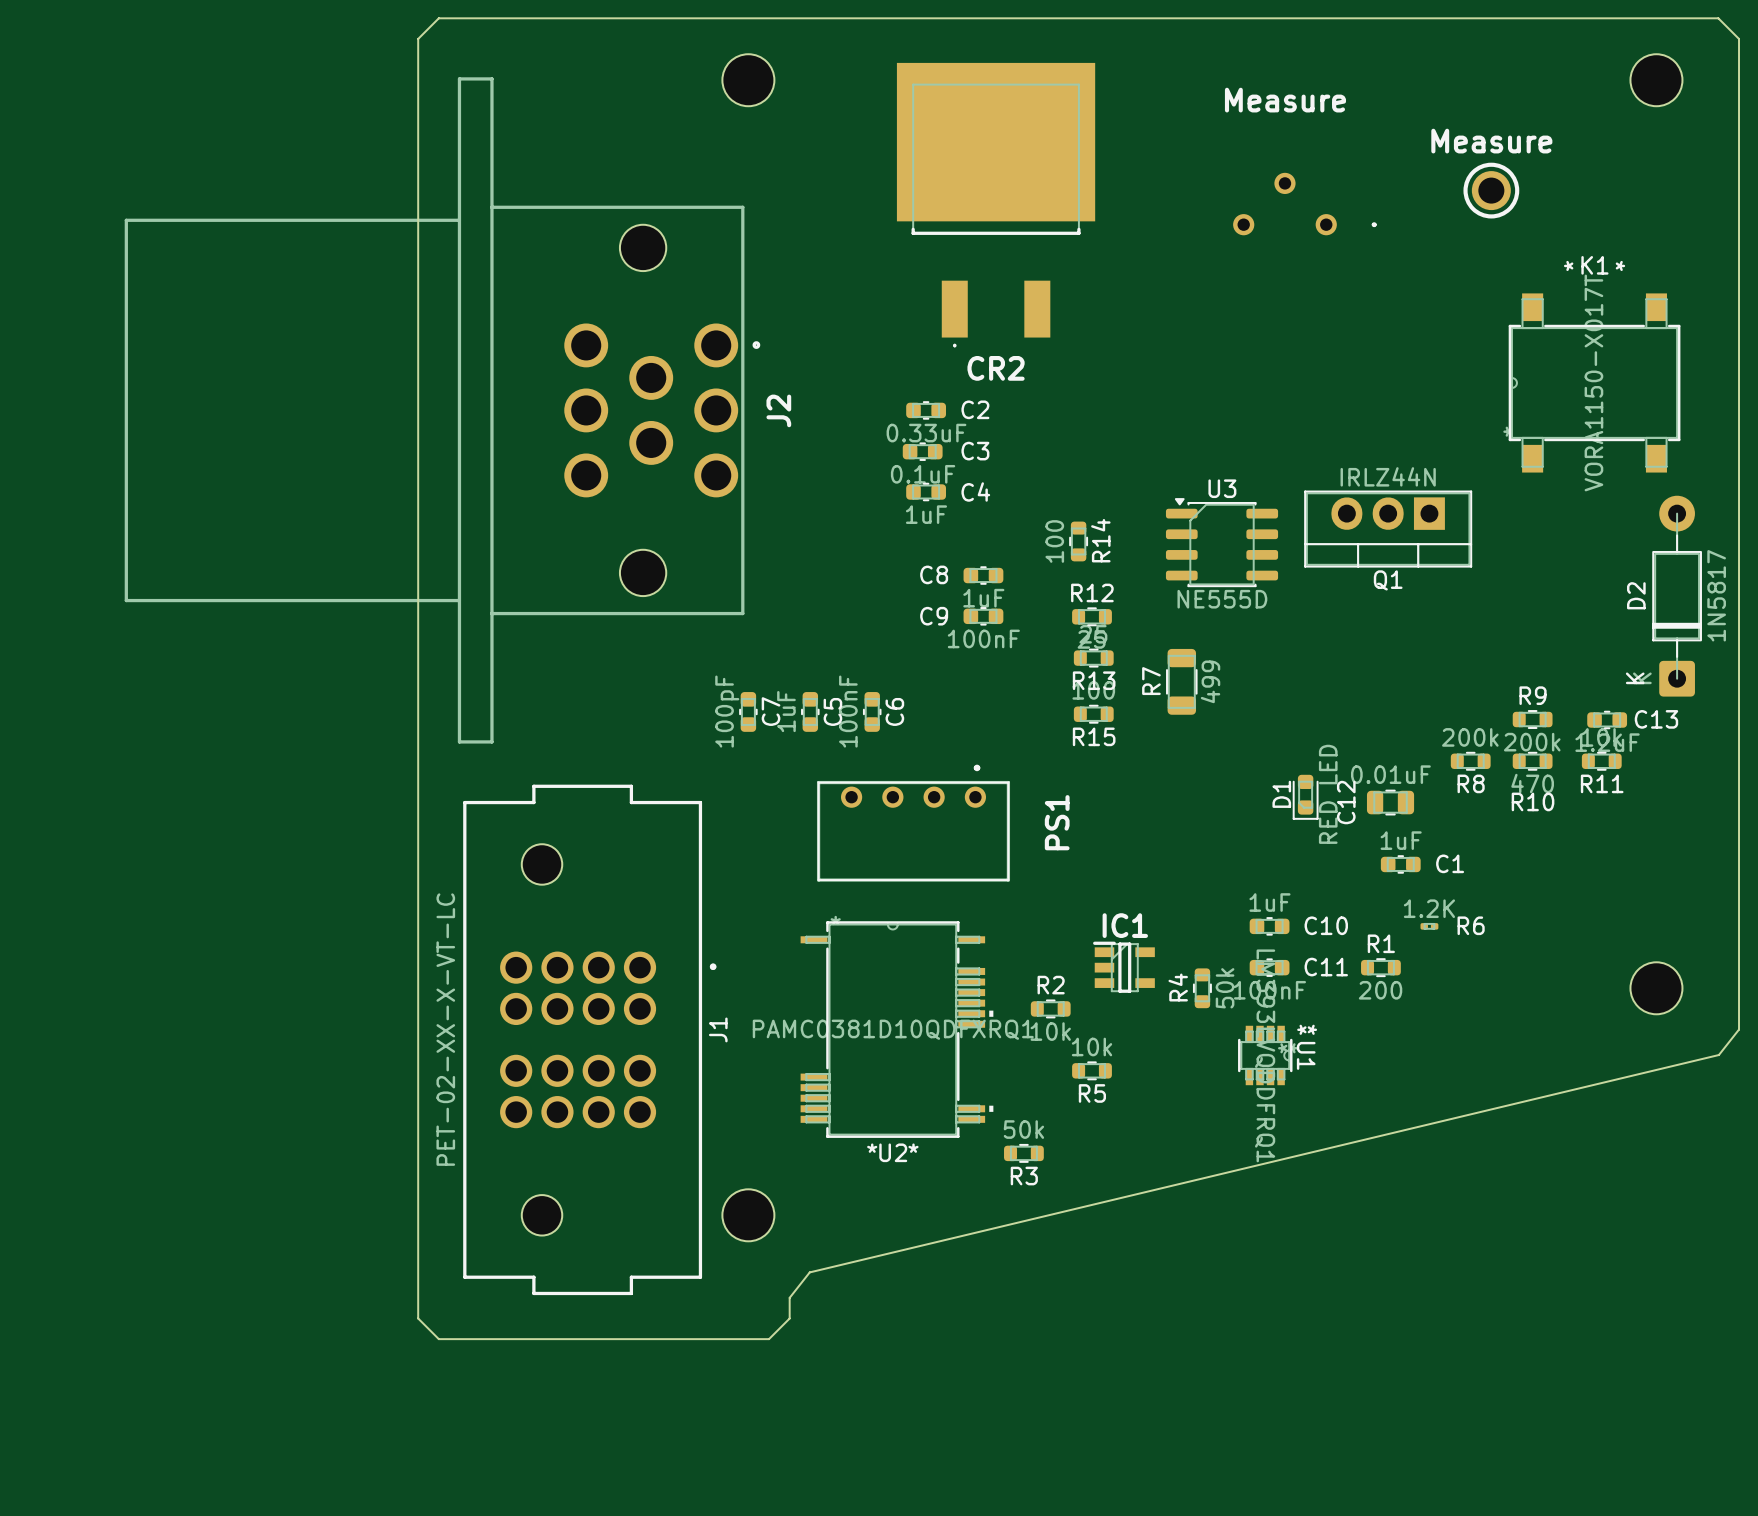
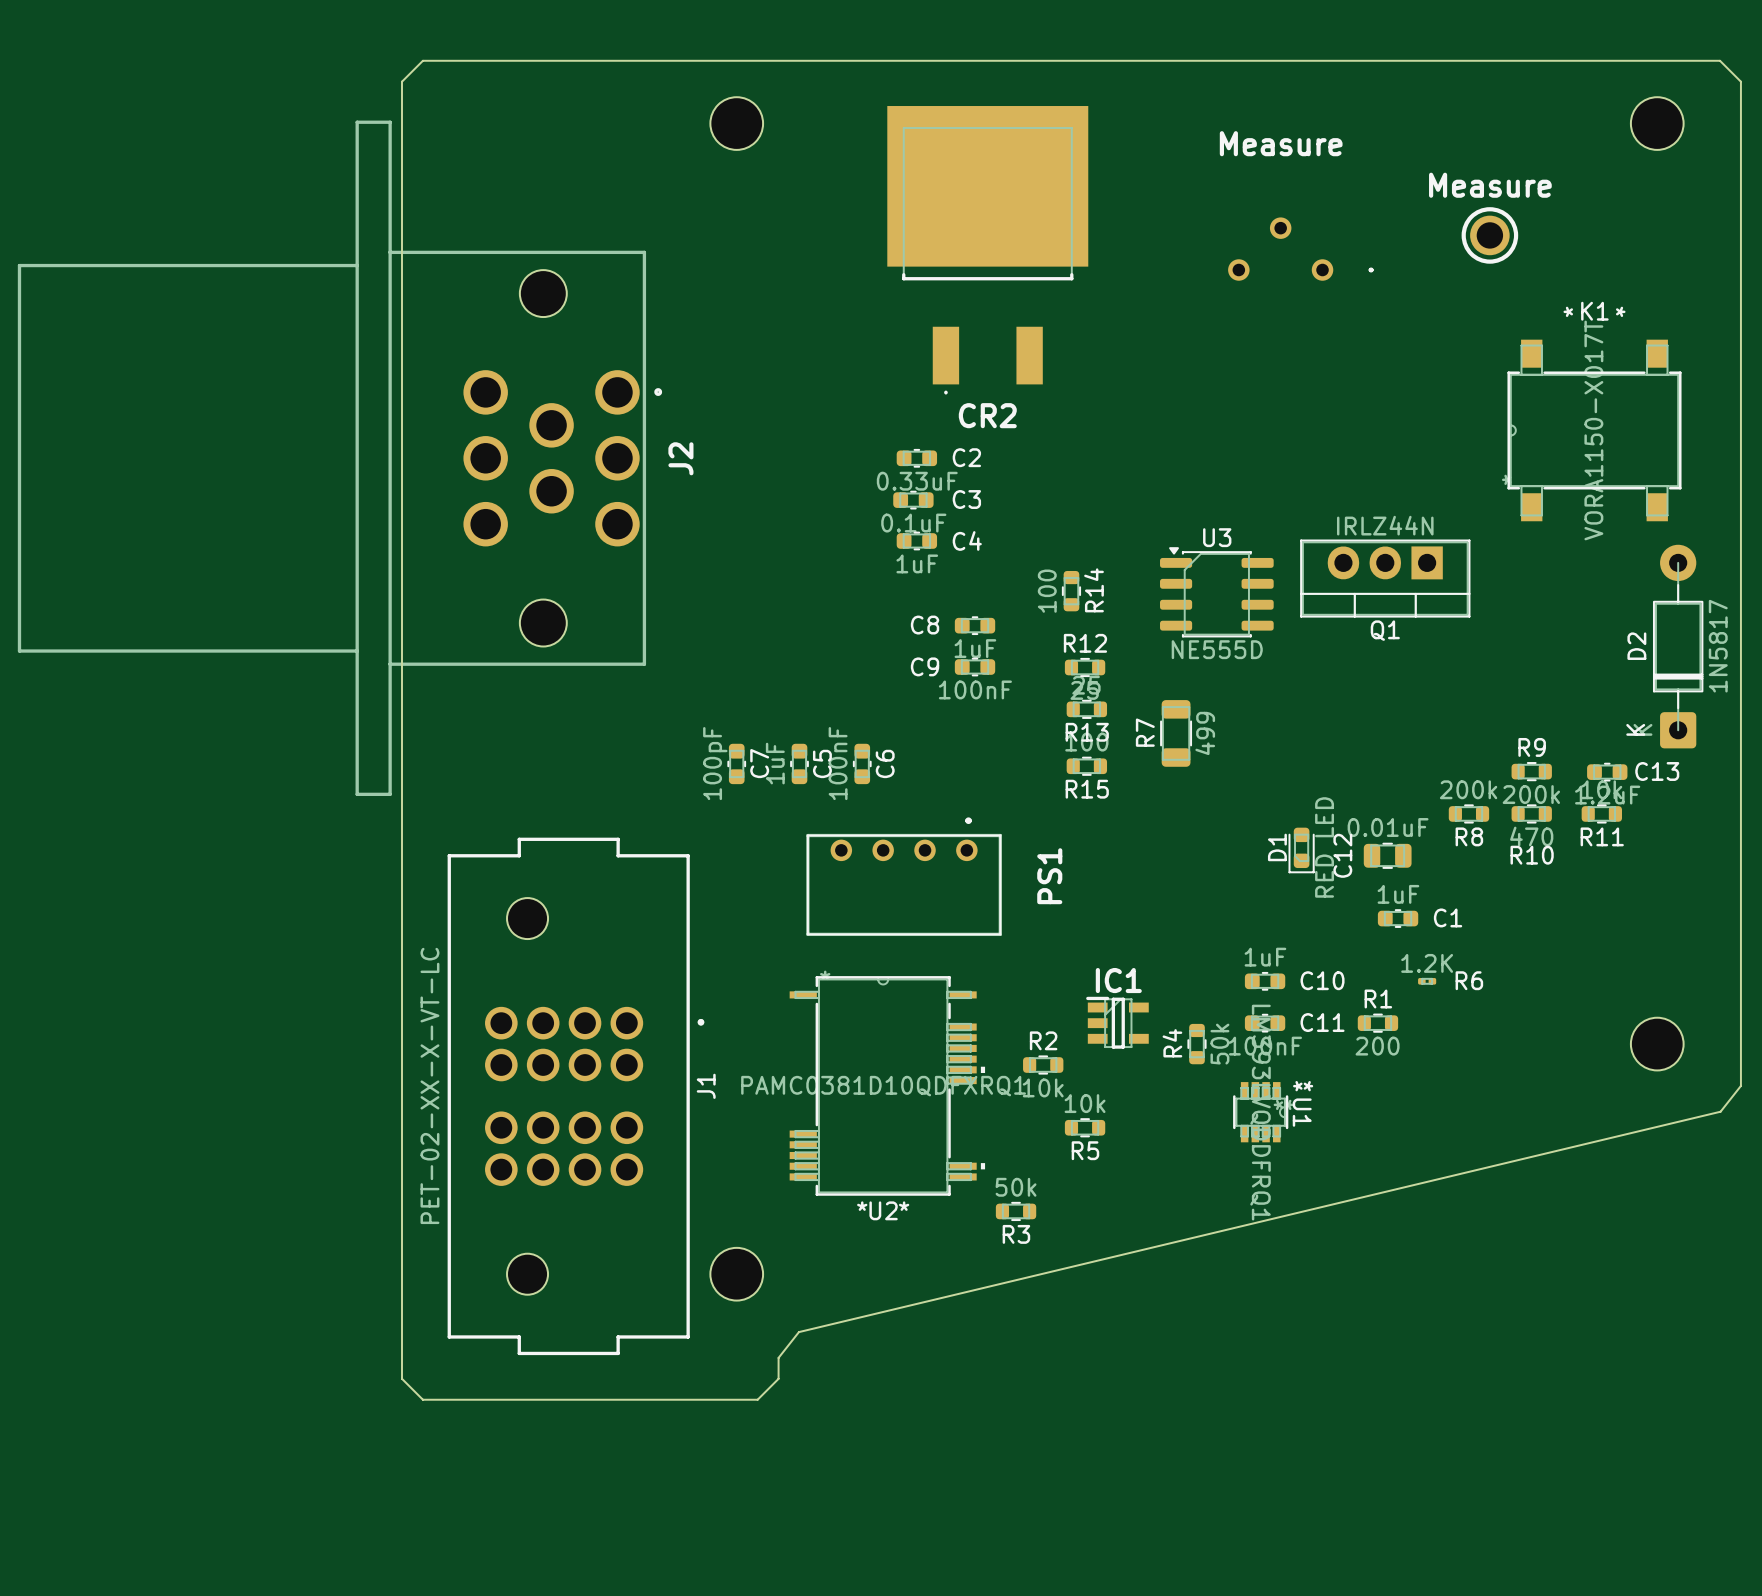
J2 position: (442, 410) -> (339, 458)

